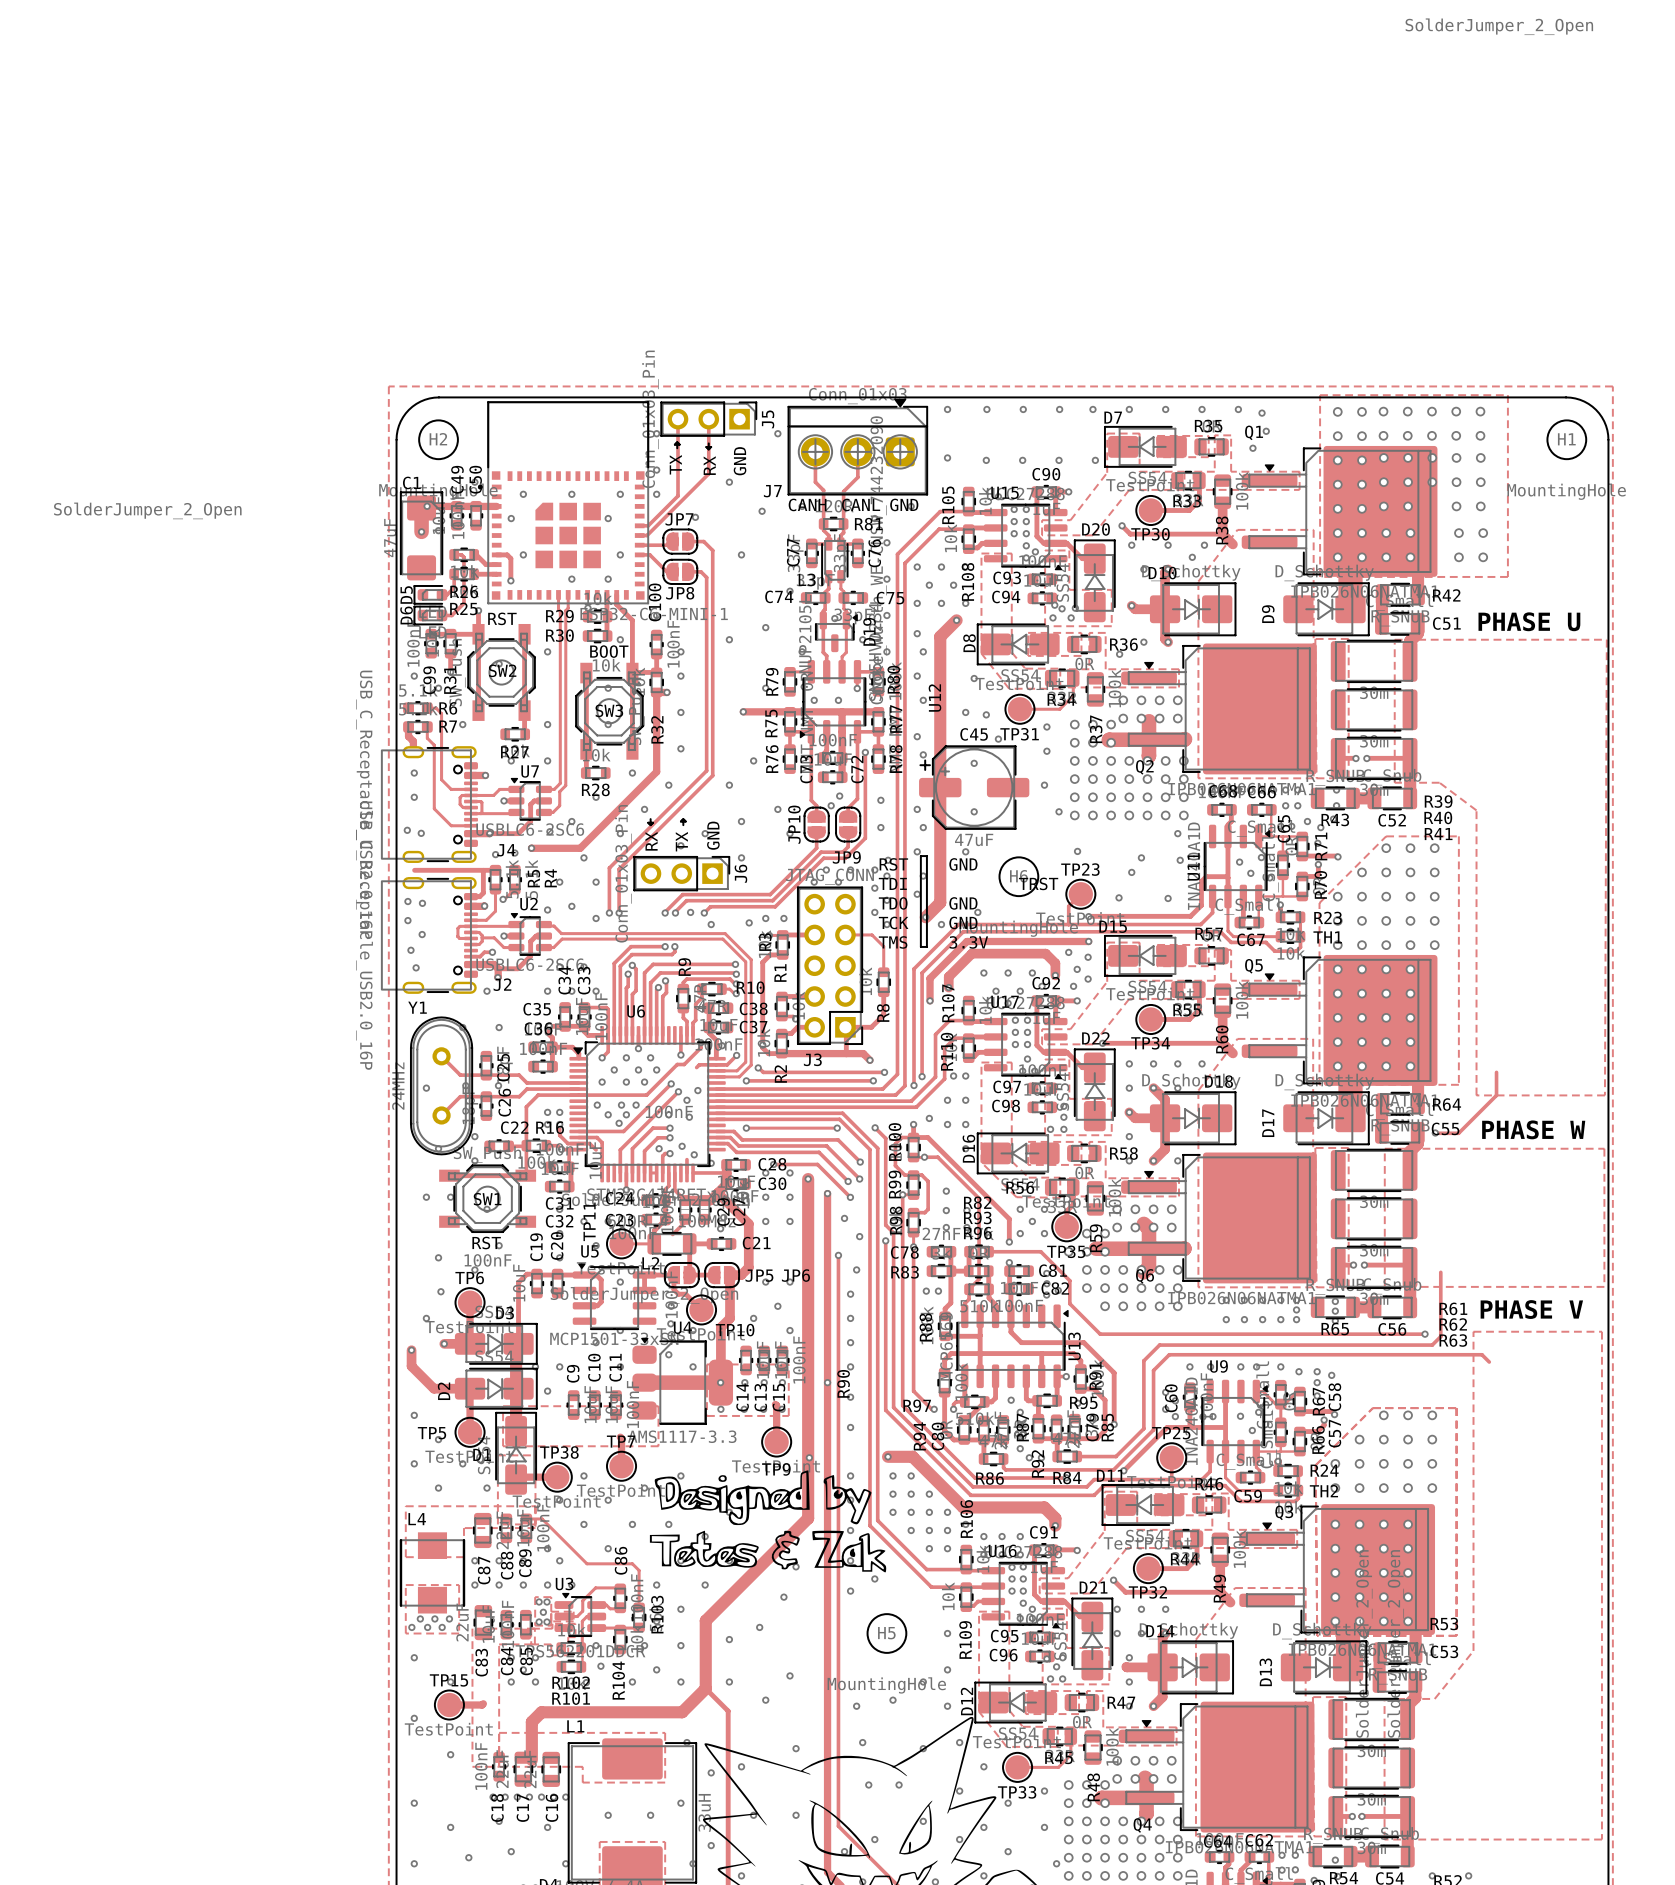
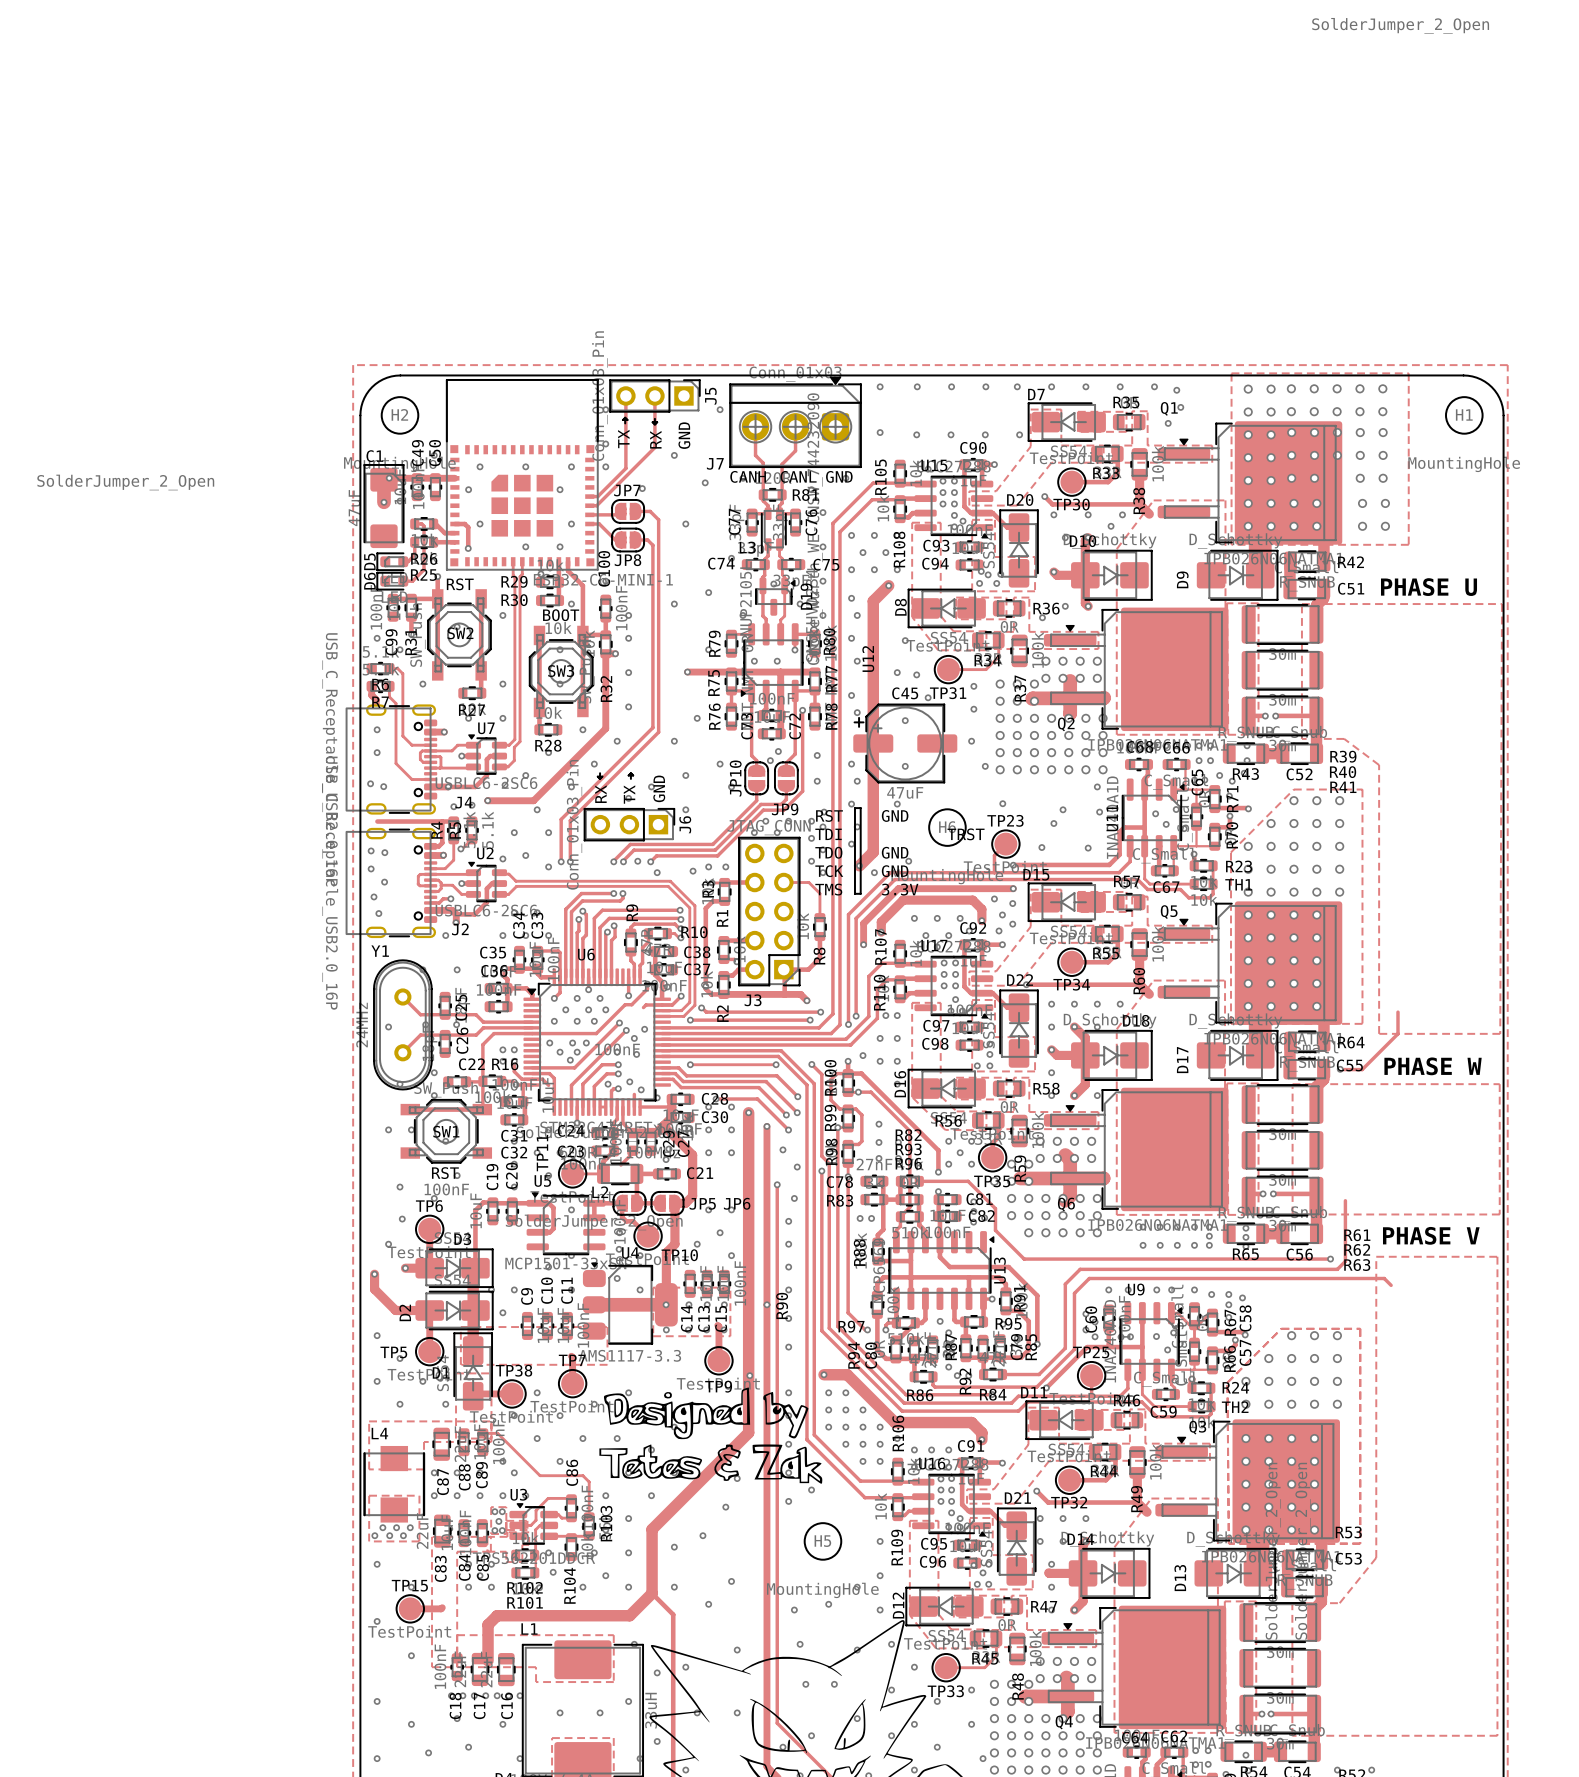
R6 name position: R6 (448, 708) -> R6 (380, 684)
R7 name position: R7 (448, 726) -> R7 (380, 702)
R5 name position: R5 (533, 878) -> R5 (455, 830)
R4 name position: R4 (550, 878) -> R4 (436, 830)

